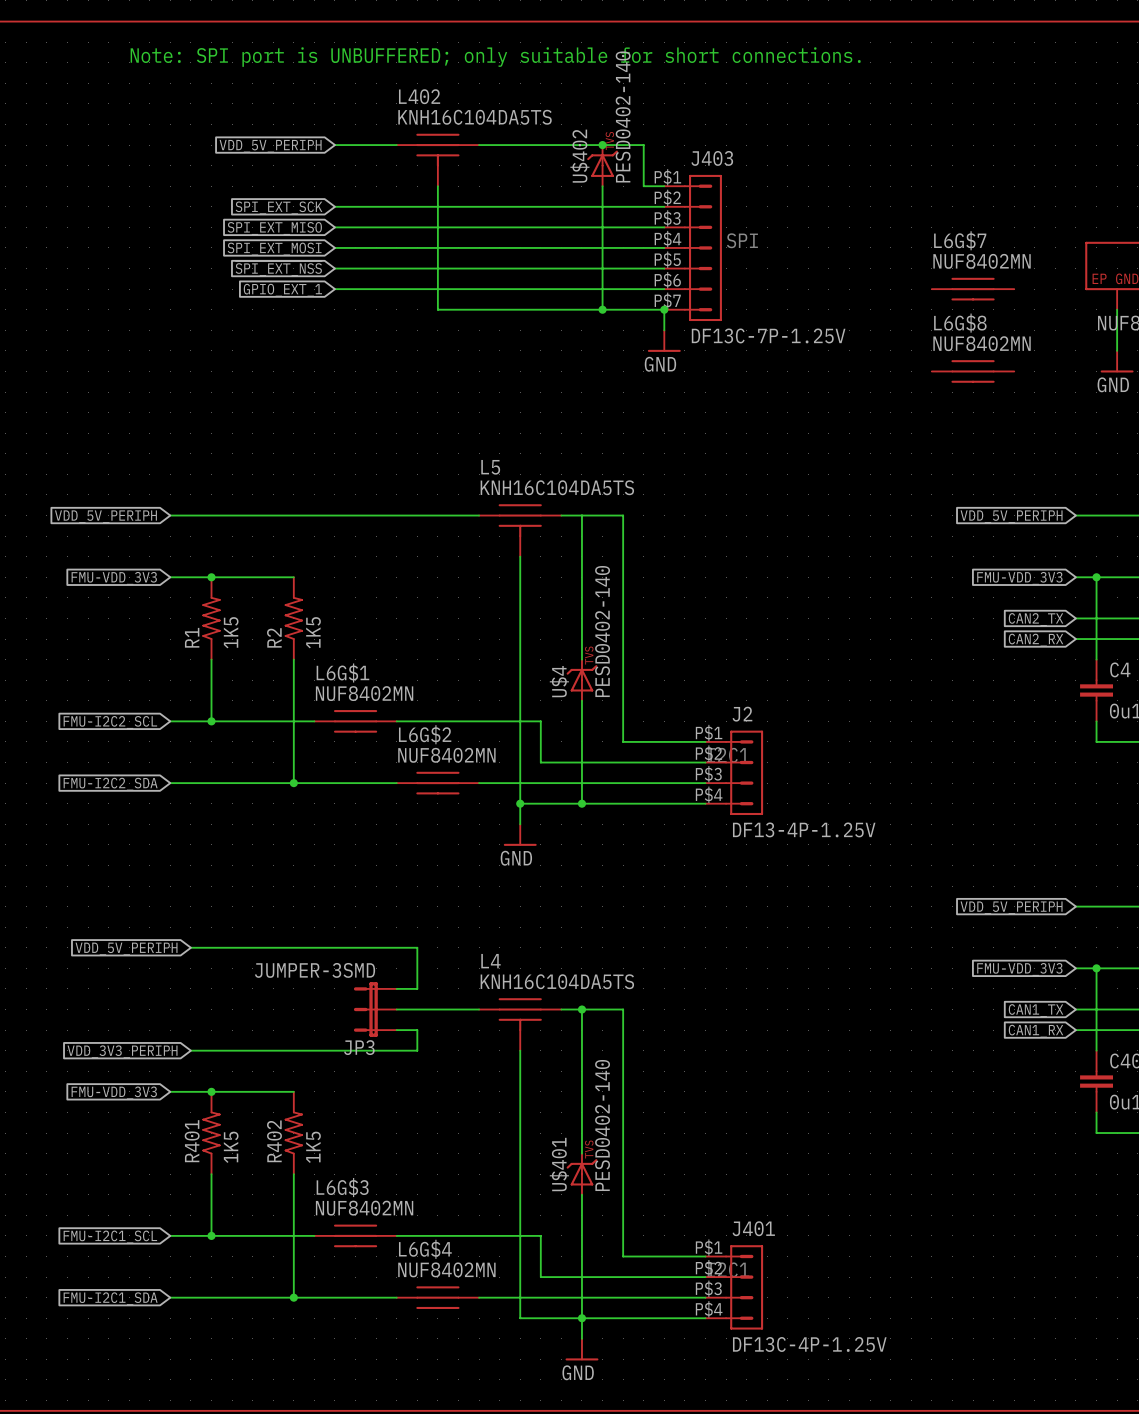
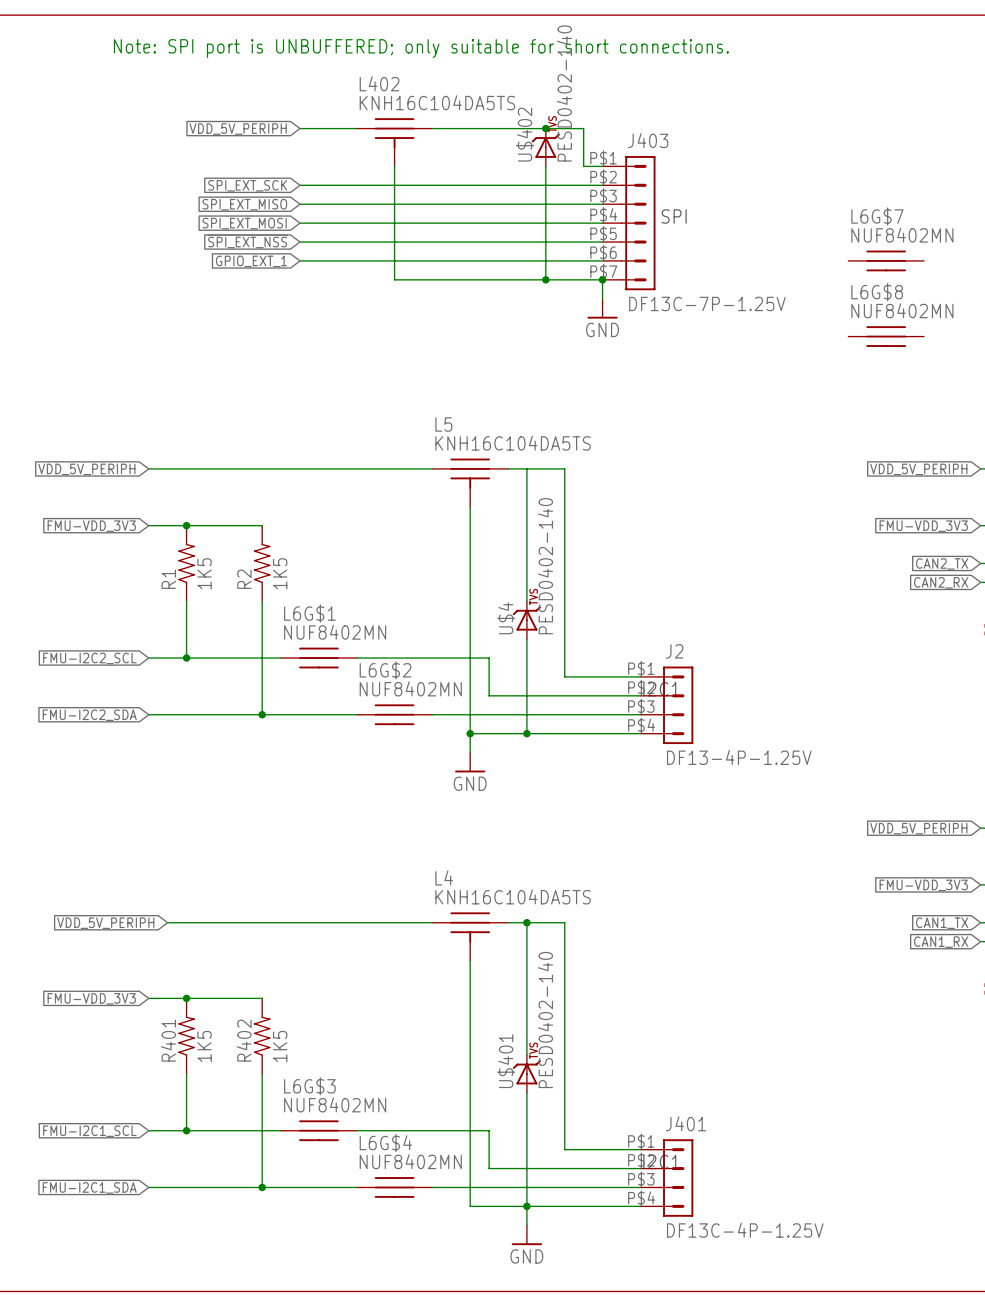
wire: (190, 947) (417, 947) (417, 988) (396, 988) -> none
global label position: VDD_5V_PERIPH (126, 949) -> VDD_5V_PERIPH (105, 923)
wire: none -> (167, 922) (356, 922)
JP3: JUMPER-3SMD (375, 1009) -> none
wire: (396, 1030) (417, 1030) (417, 1050) (190, 1050) -> none
global label: VDD_3V3_PERIPH (122, 1051) -> none

